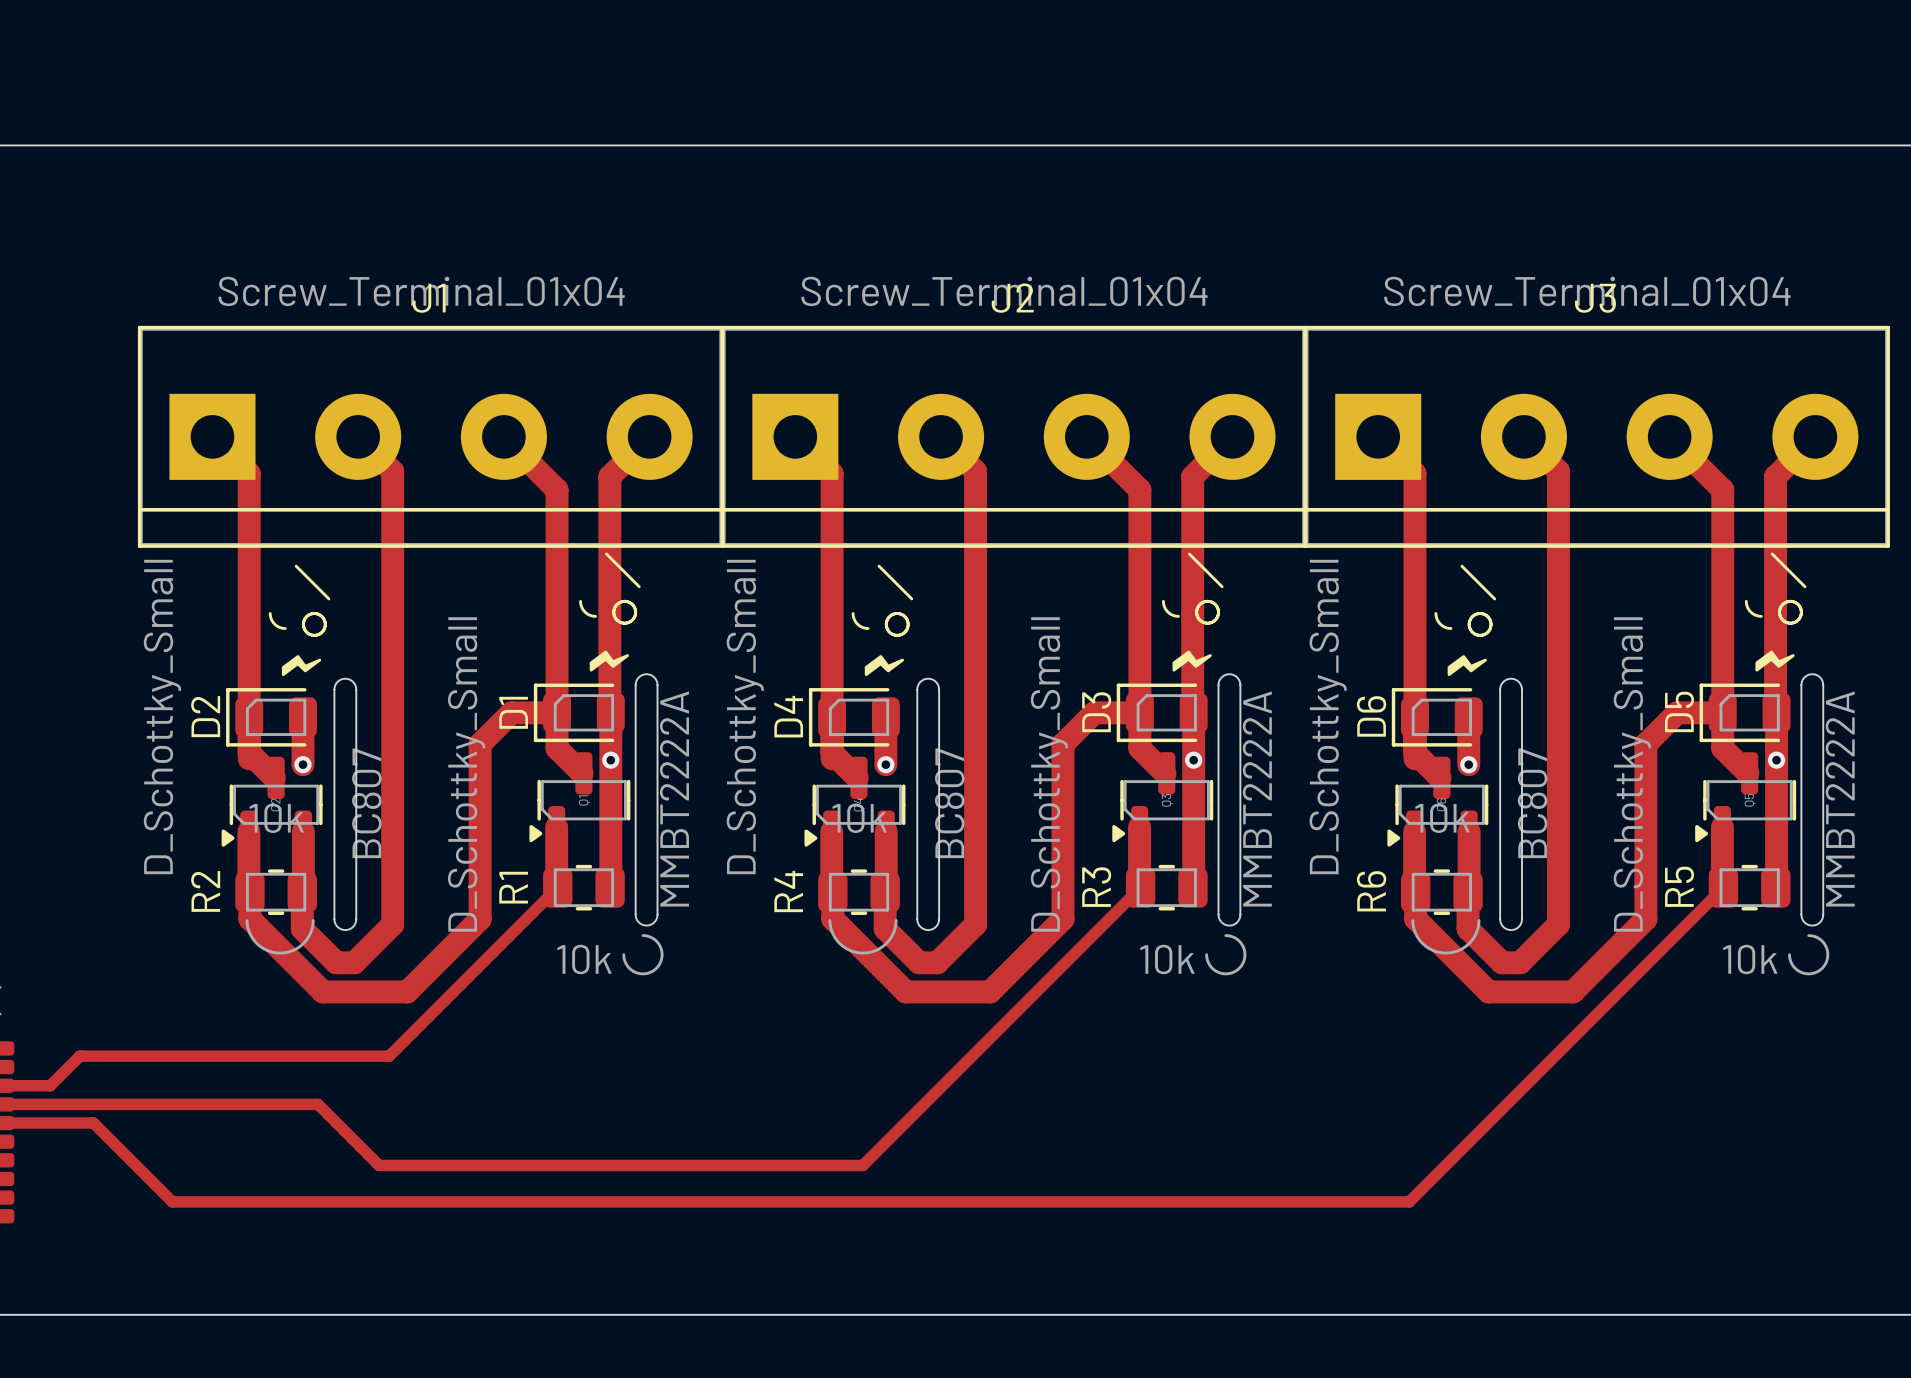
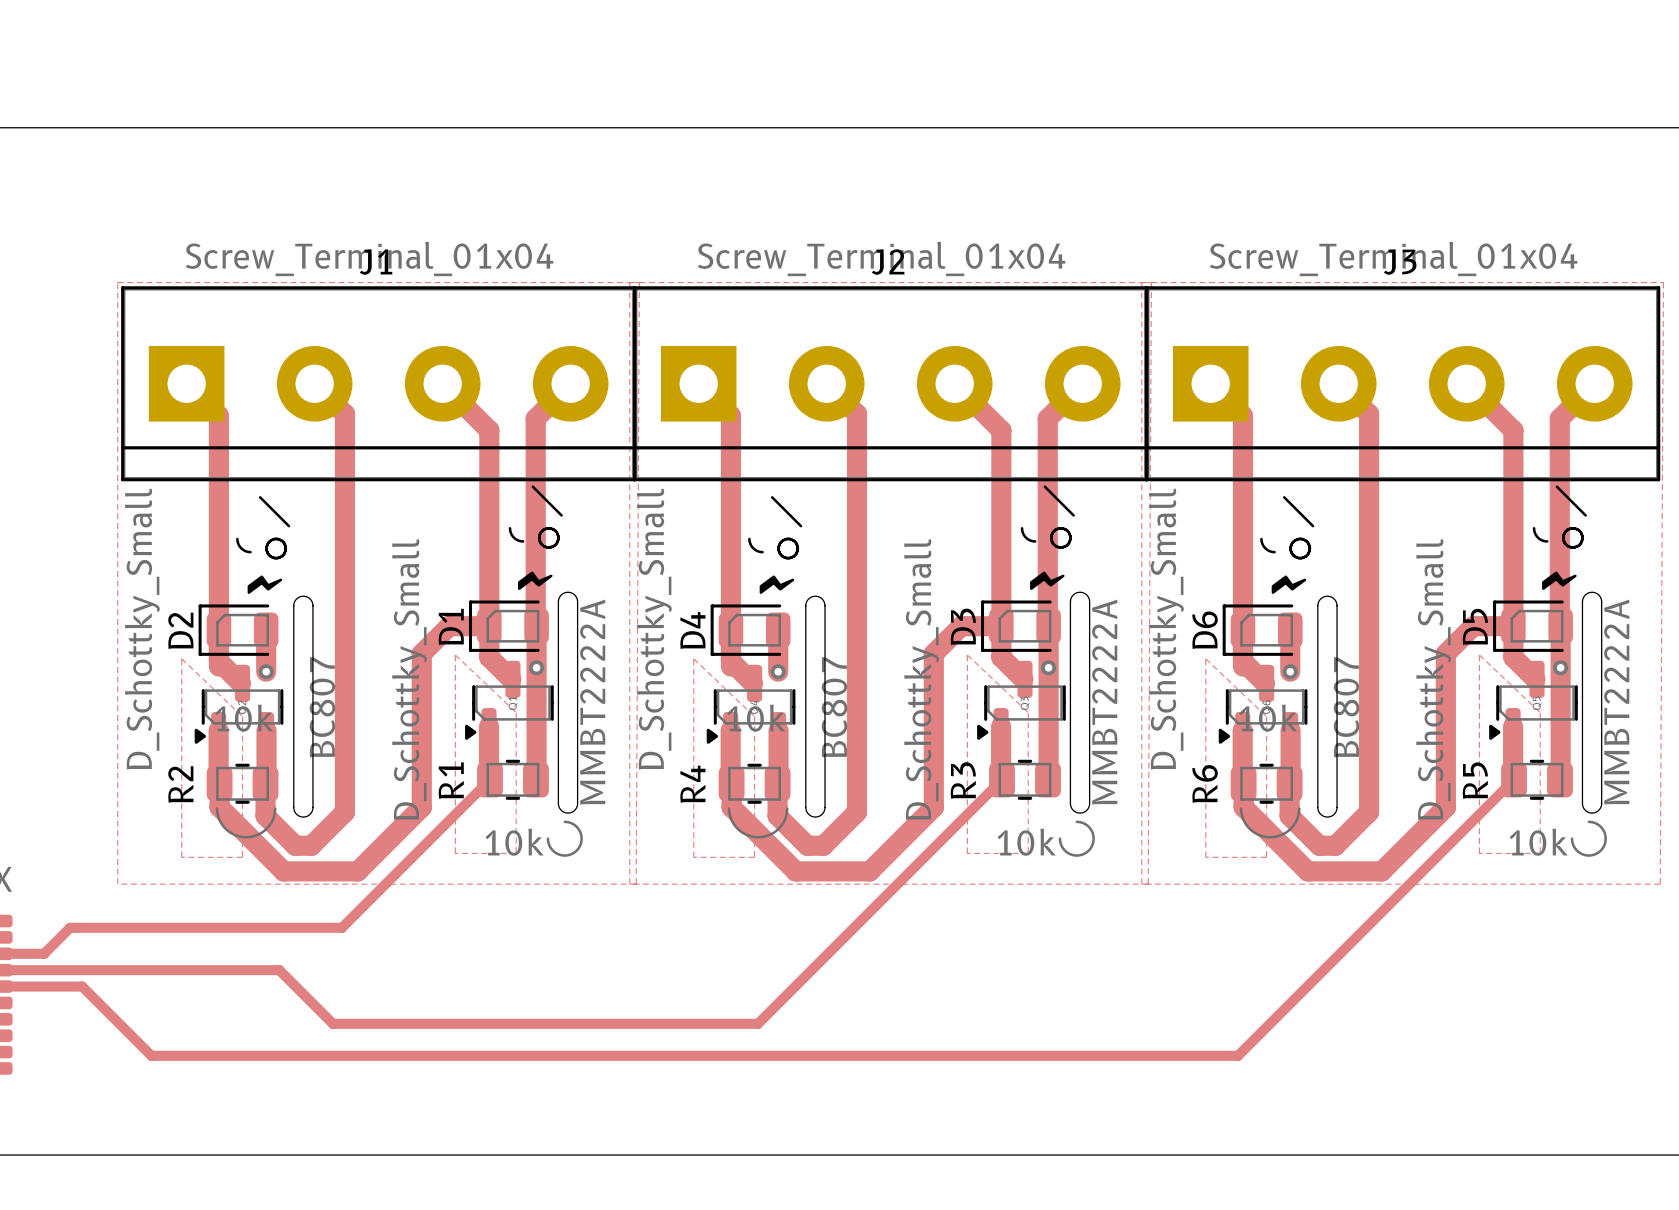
zone outline: none -> (117, 282) (1663, 282) (1660, 884) (117, 884) (117, 282)
zone outline: none -> (629, 282) (629, 884)
zone outline: none -> (639, 282) (636, 884)
zone outline: none -> (1141, 282) (1141, 884)
zone outline: none -> (1151, 282) (1148, 884)
zone outline: none -> (455, 655) (455, 853) (516, 853) (516, 712) (455, 655)
zone outline: none -> (967, 655) (967, 853) (1028, 853) (1028, 712) (967, 655)
zone outline: none -> (1479, 655) (1479, 853) (1540, 853) (1540, 712) (1479, 655)
zone outline: none -> (181, 658) (181, 857) (242, 857) (242, 716) (181, 658)
zone outline: none -> (693, 658) (693, 857) (754, 857) (754, 716) (693, 658)
zone outline: none -> (1205, 658) (1205, 857) (1266, 857) (1266, 716) (1205, 658)

